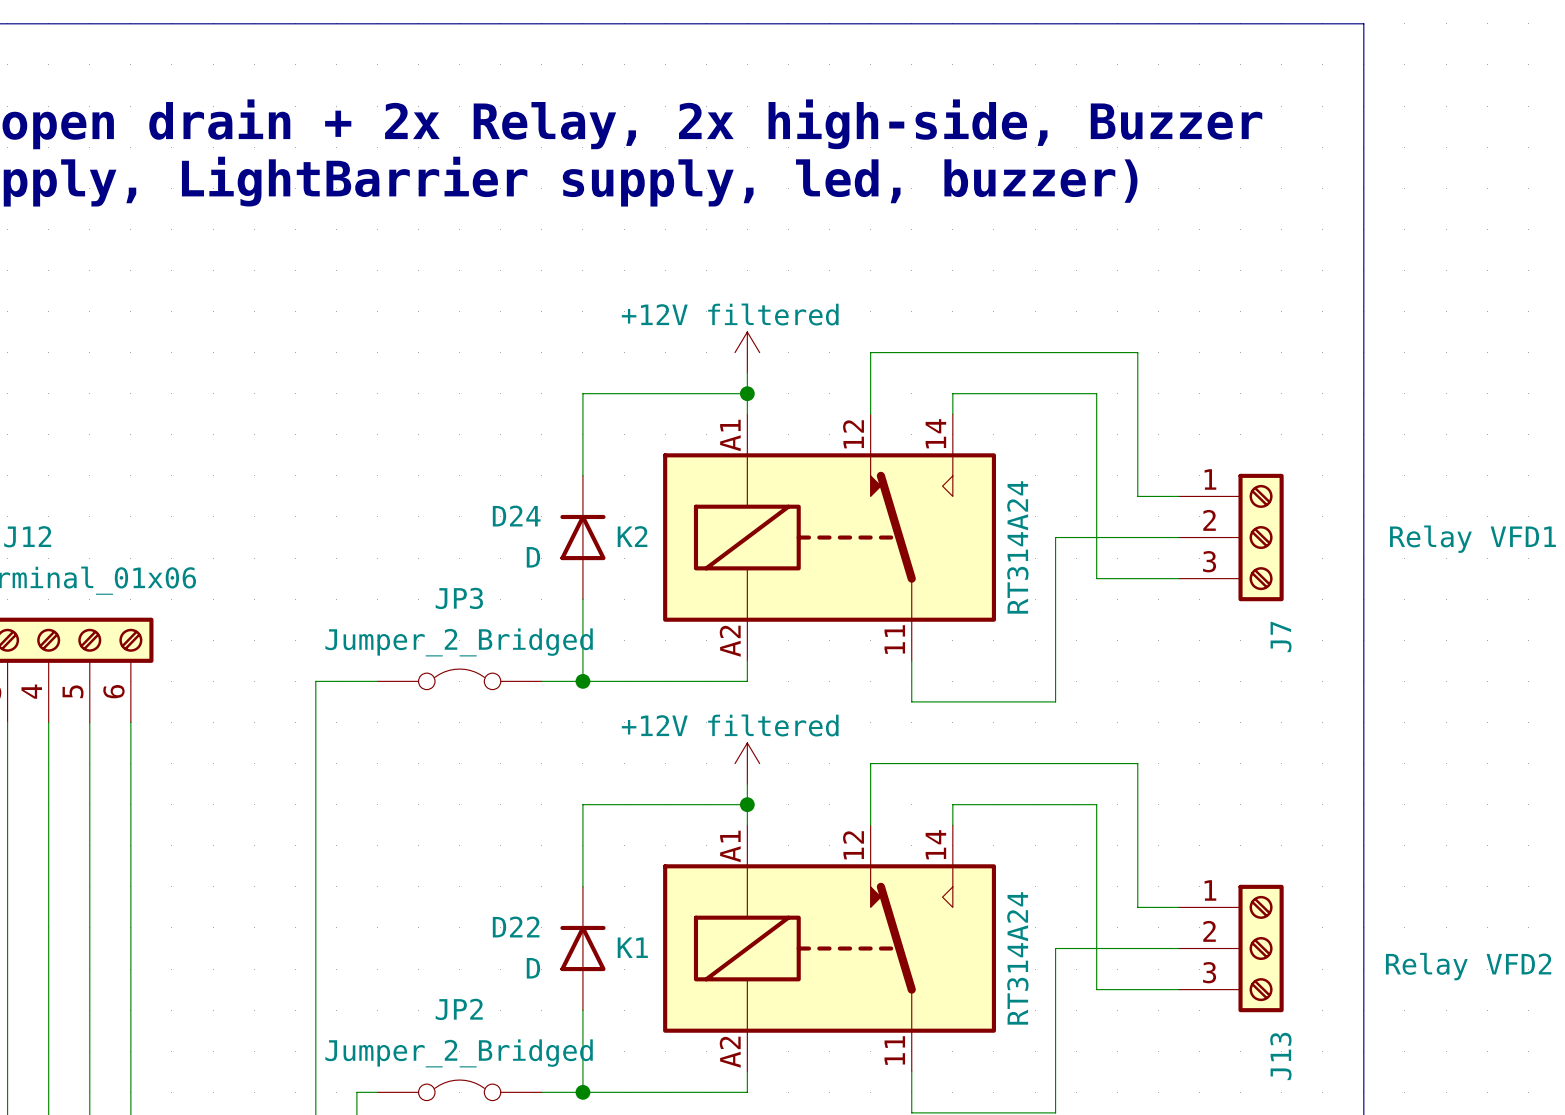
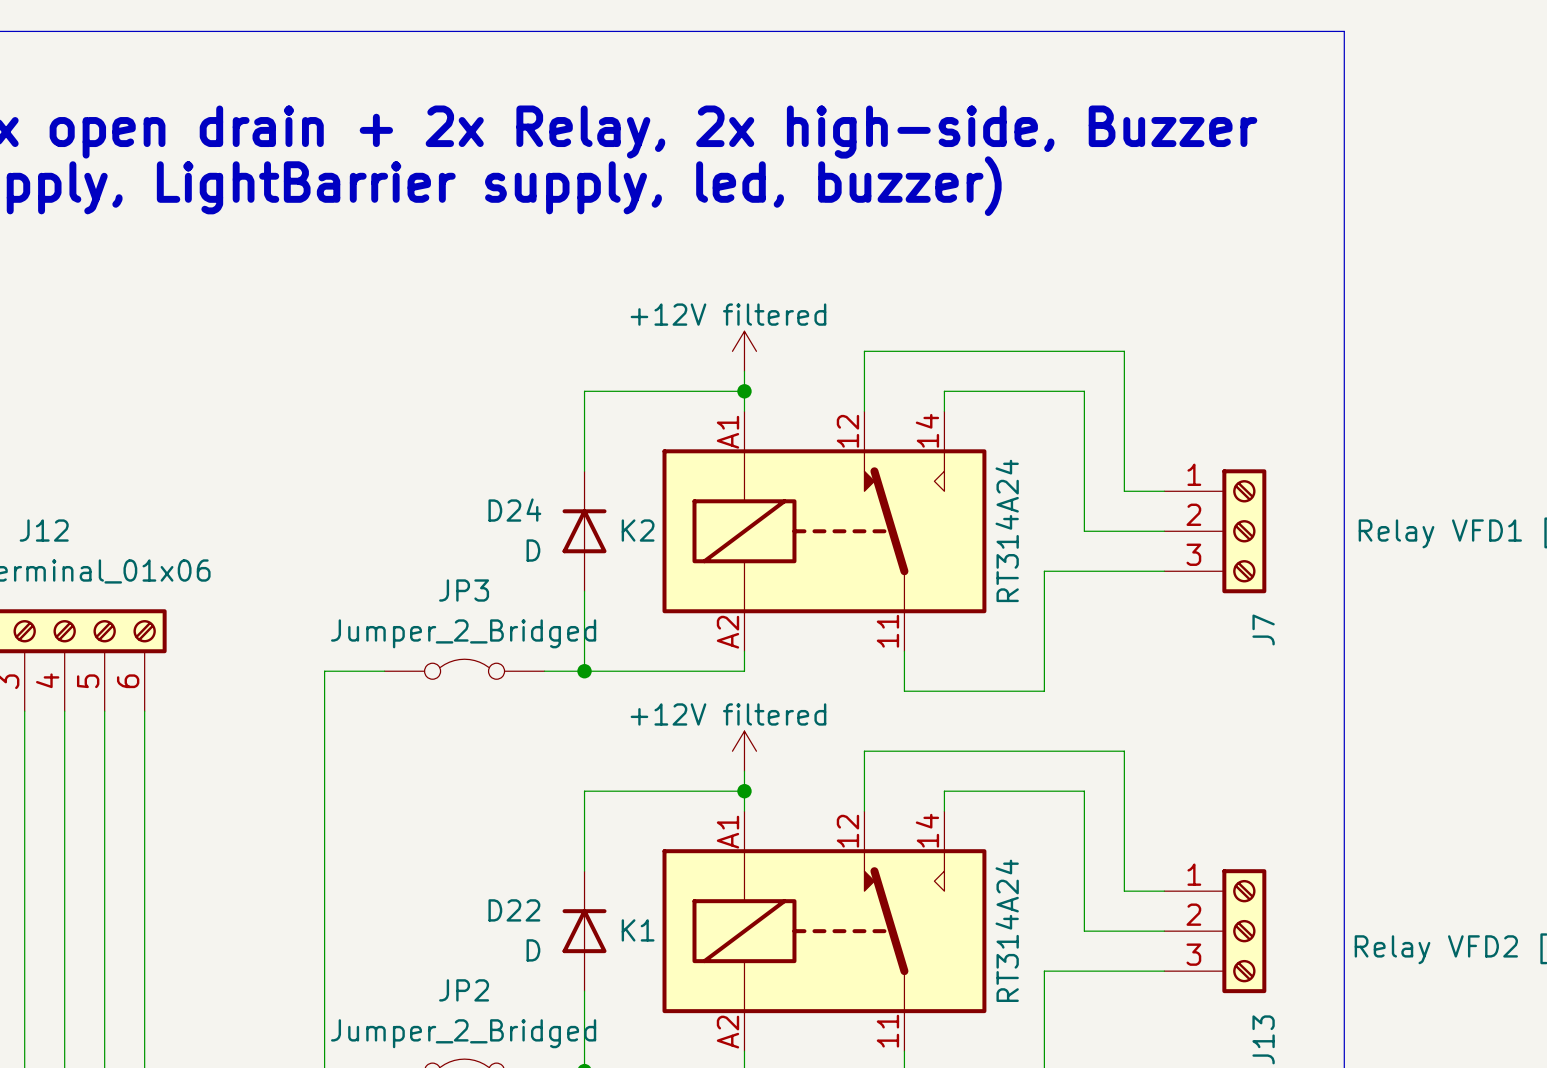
wire: (1055, 578) (1055, 537) (1096, 537) (1096, 578) -> (1044, 571) (1084, 571)
wire: (1055, 989) (1055, 948) (1096, 948) (1096, 989) -> (1044, 971) (1084, 971)

